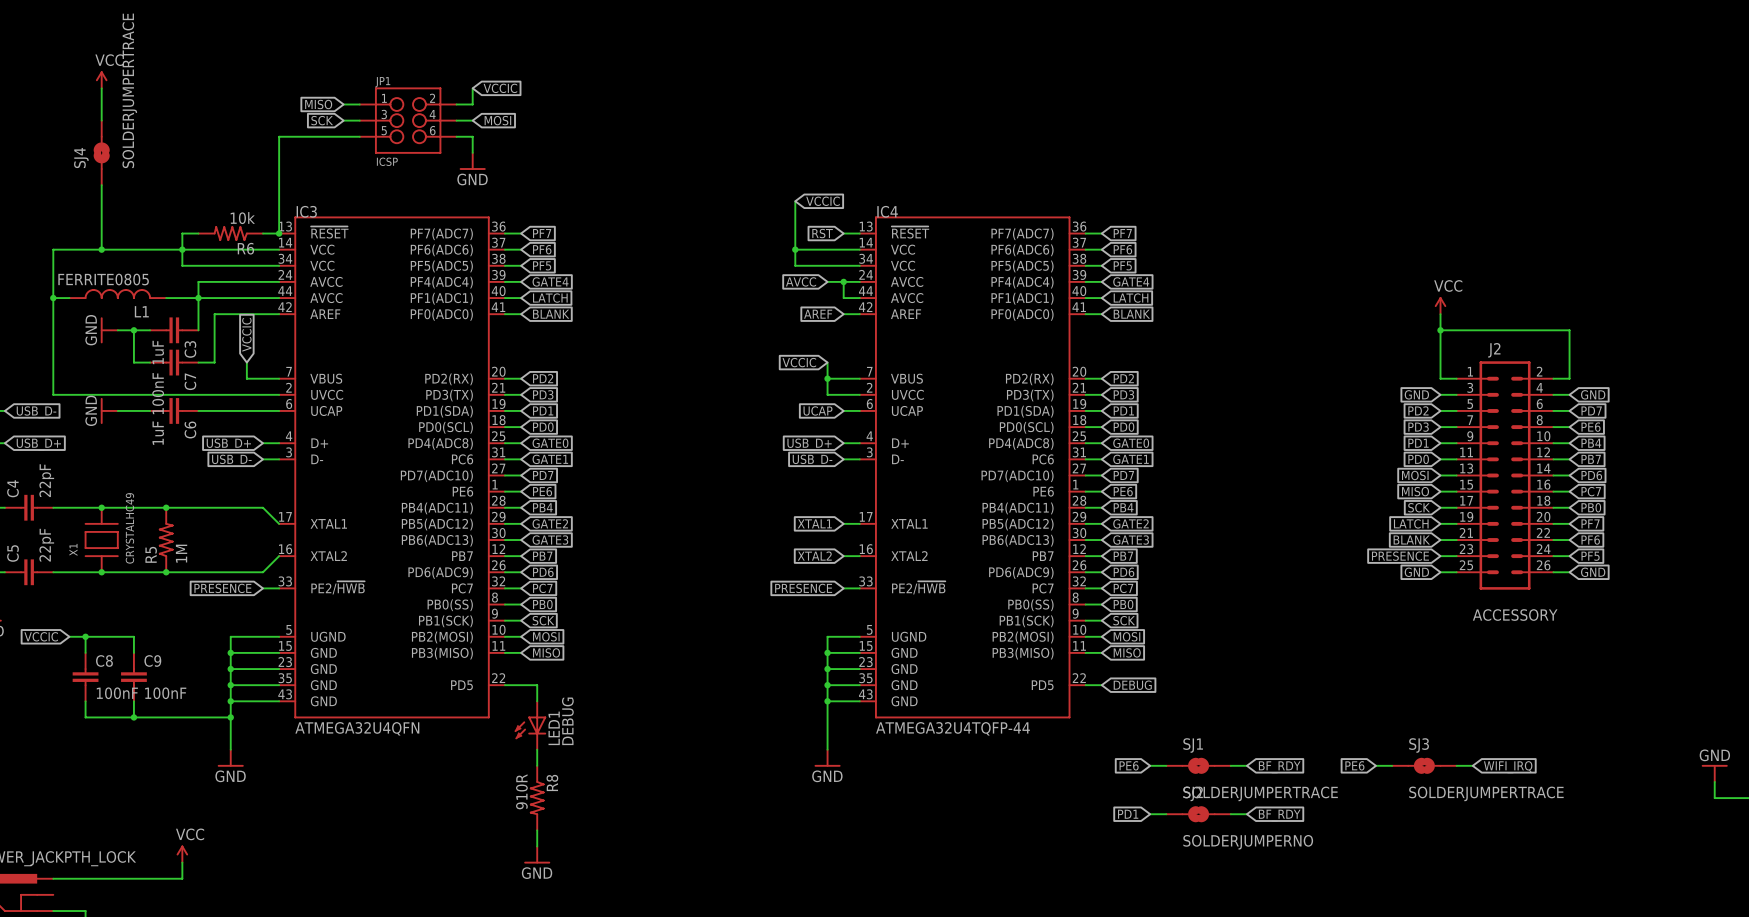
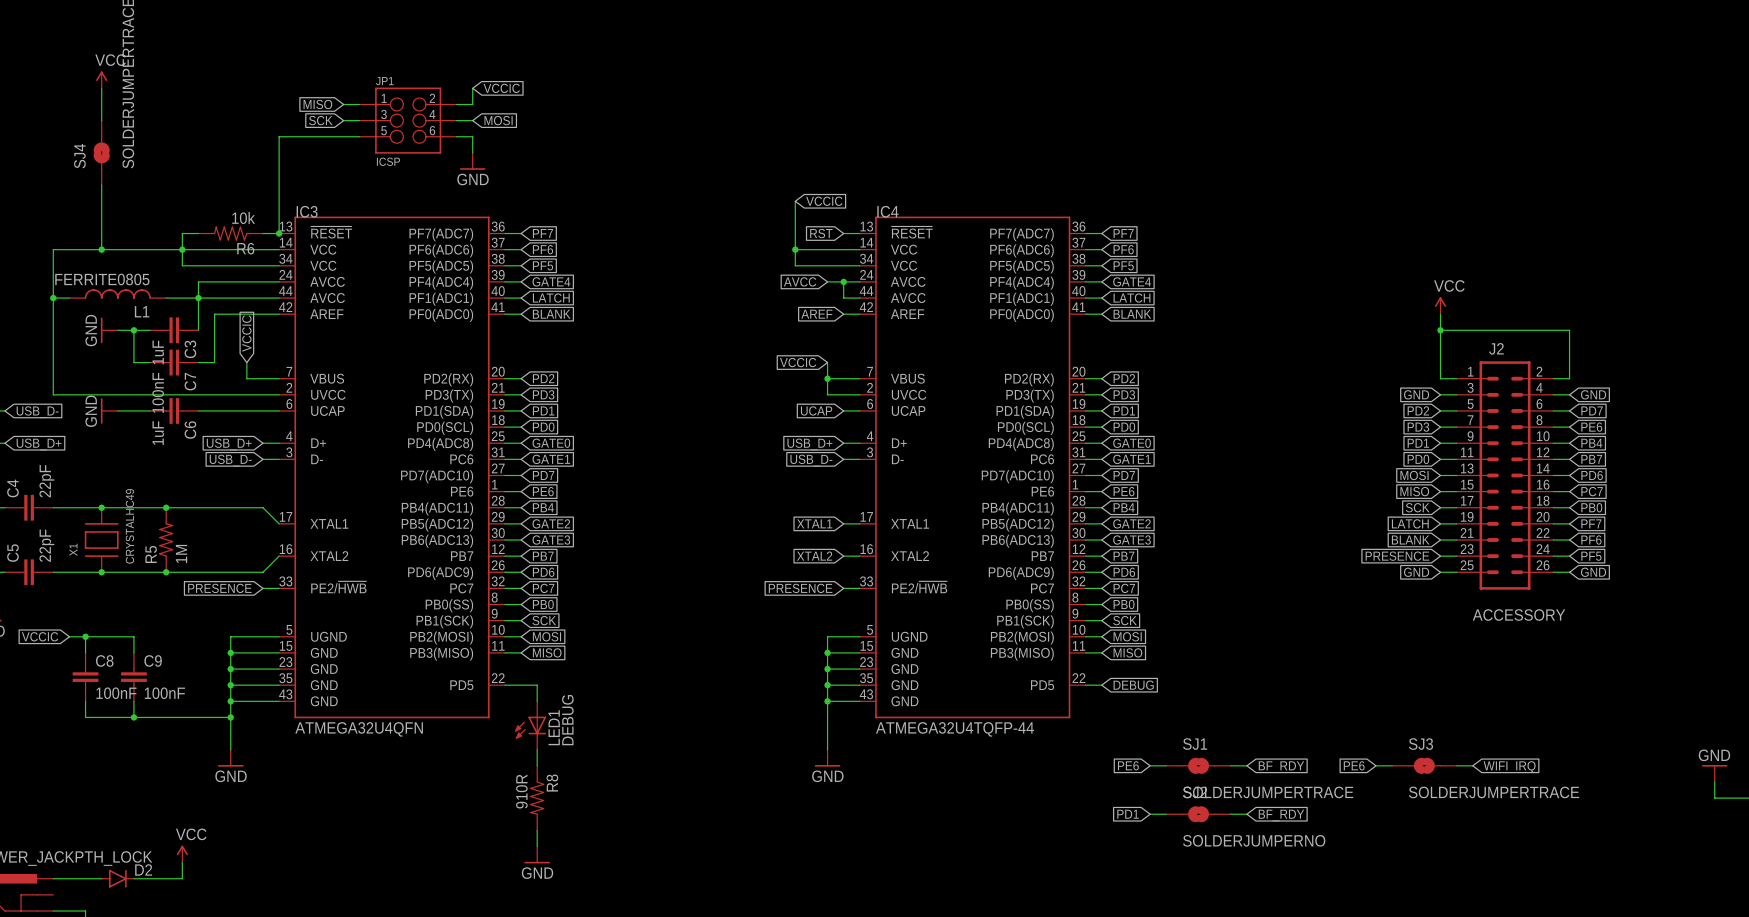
D2: none -> (117, 878)

